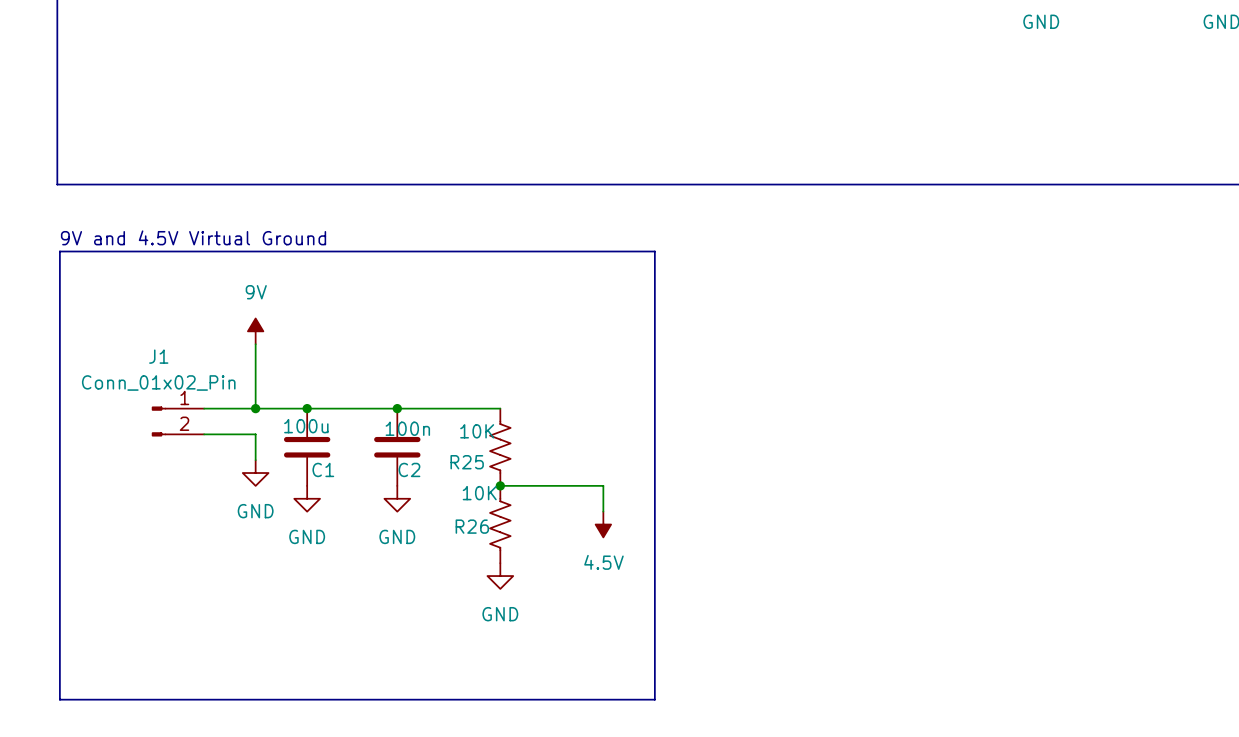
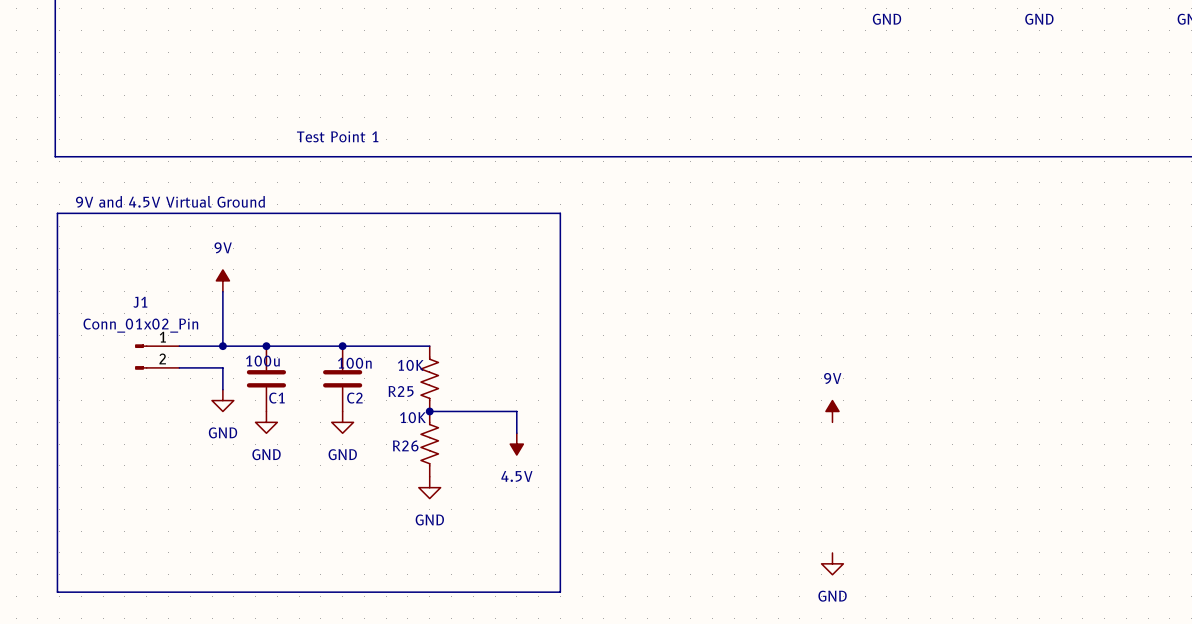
text: none -> Test Point 1 (337, 136)
power symbol: none -> 9V (832, 411)
power symbol: none -> GND (832, 563)

